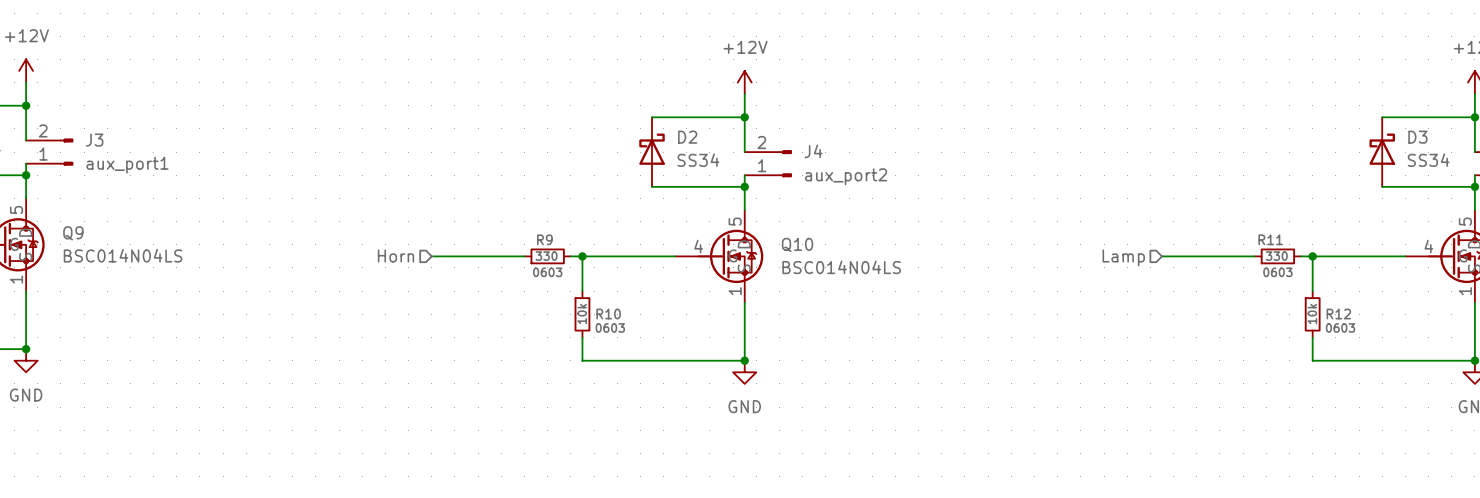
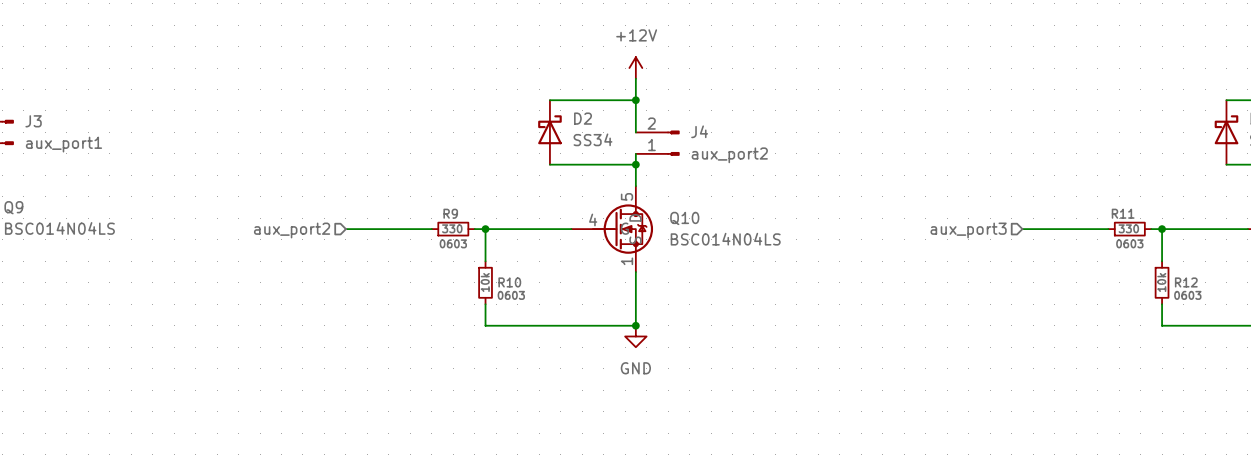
hierarchical label: Horn (395, 255) -> aux_port2 (292, 230)
hierarchical label: Lamp (1123, 257) -> aux_port3 (968, 230)

